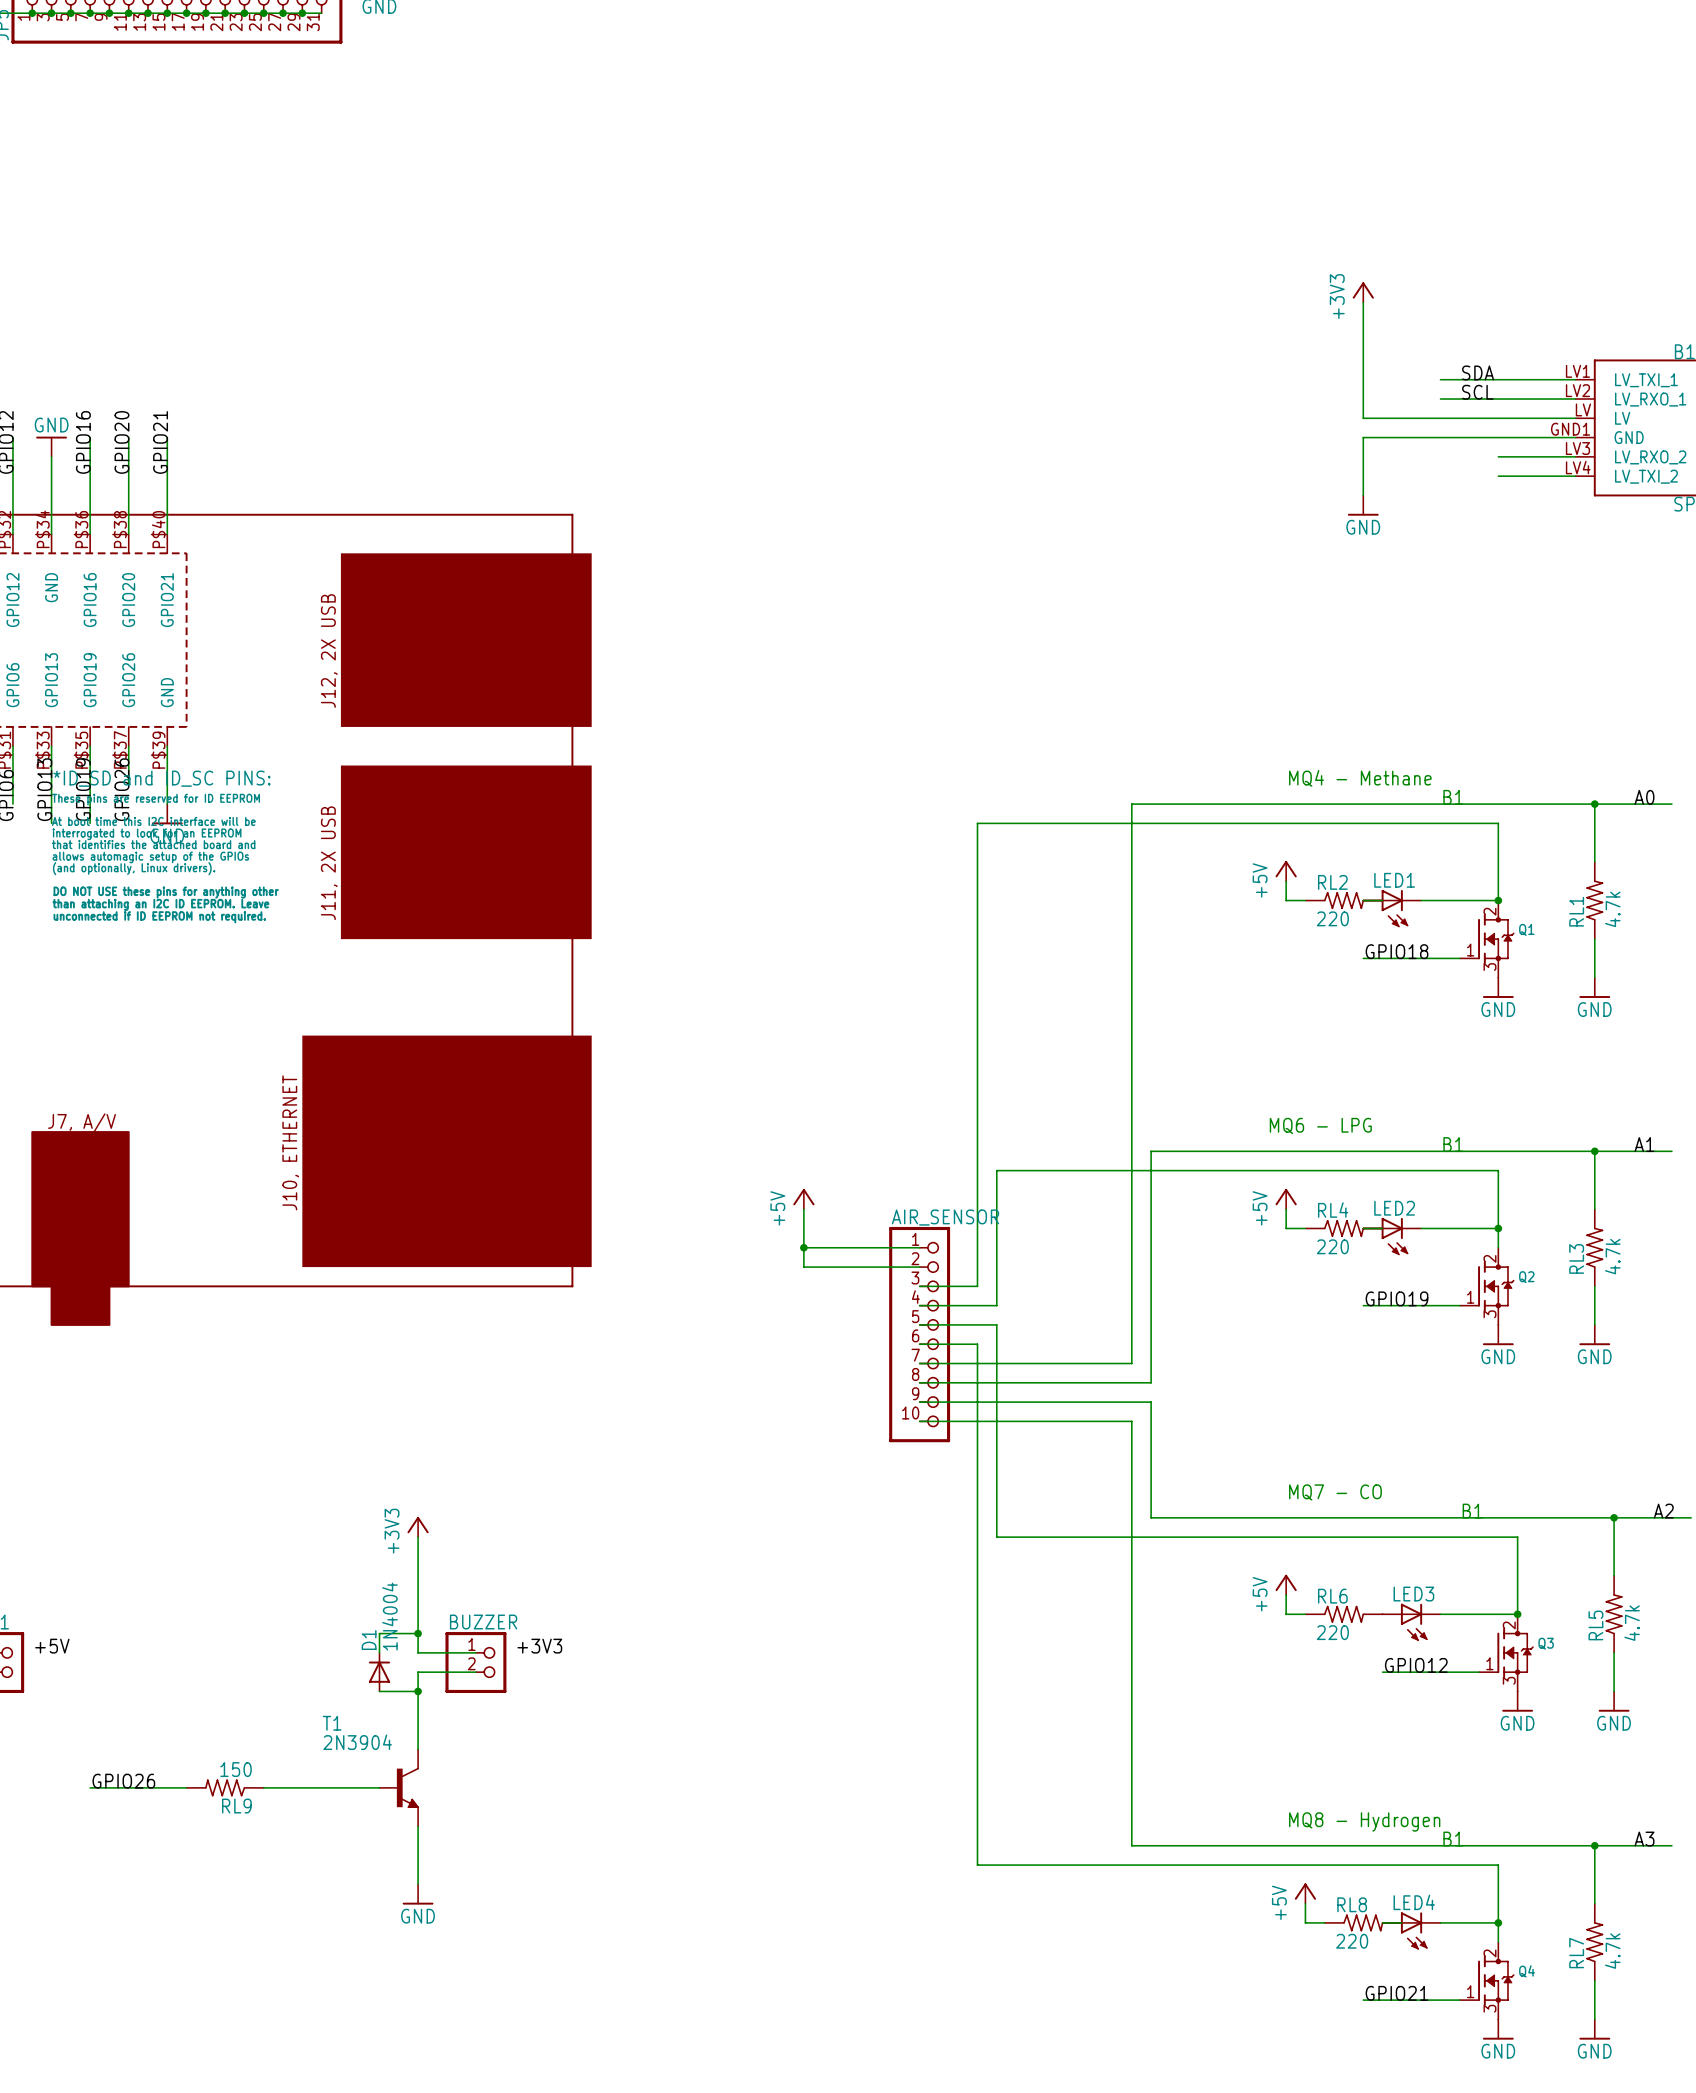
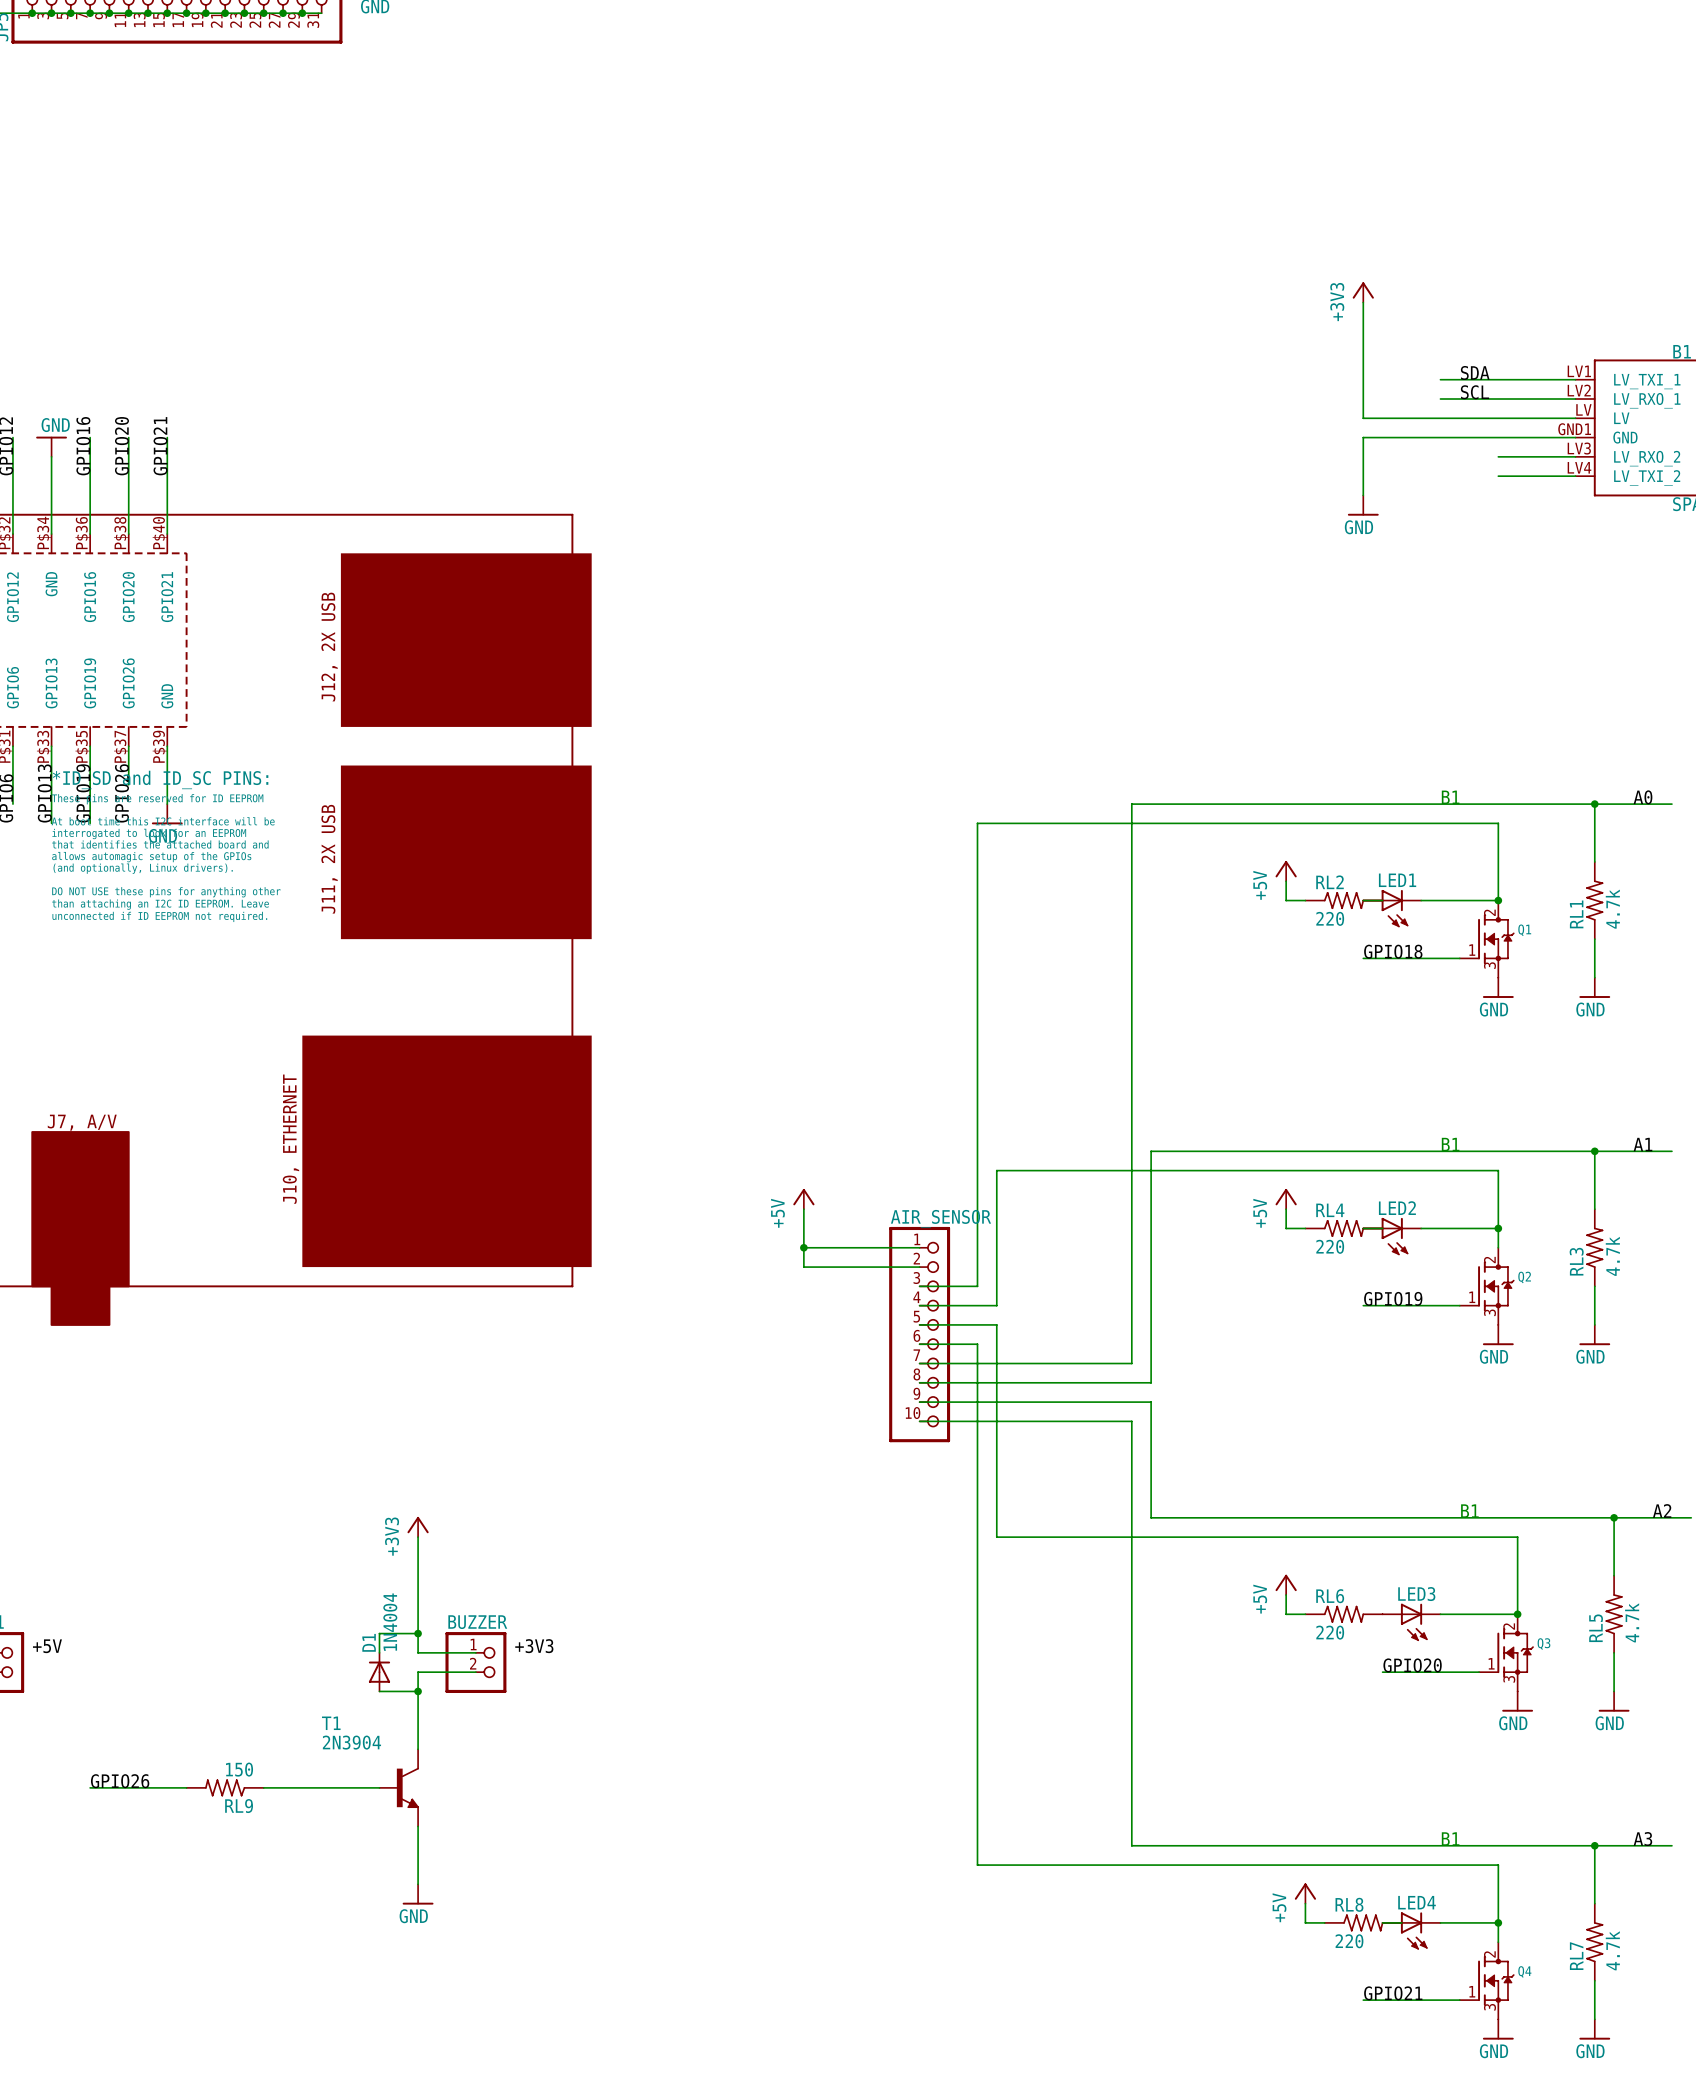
text: MQ4 - Methane (1360, 778) -> none
text: MQ6 - LPG (1320, 1125) -> none
text: MQ7 - CO (1335, 1492) -> none
label: GPIO12 (1416, 1665) -> GPIO20 (1412, 1665)
text: MQ8 - Hydrogen (1364, 1821) -> none

